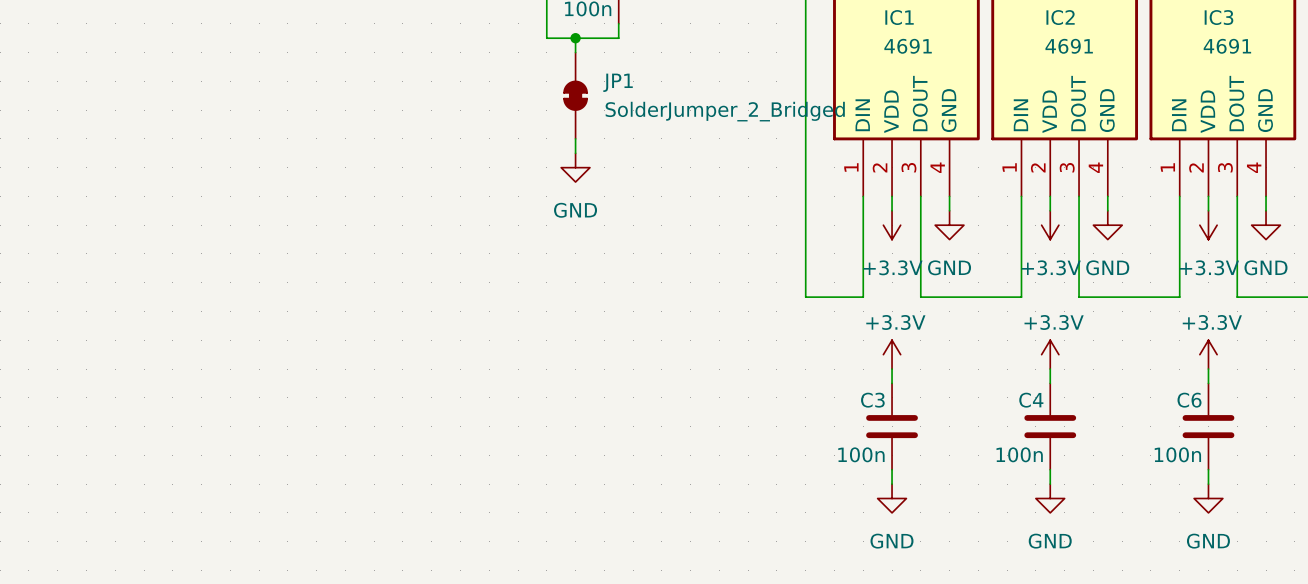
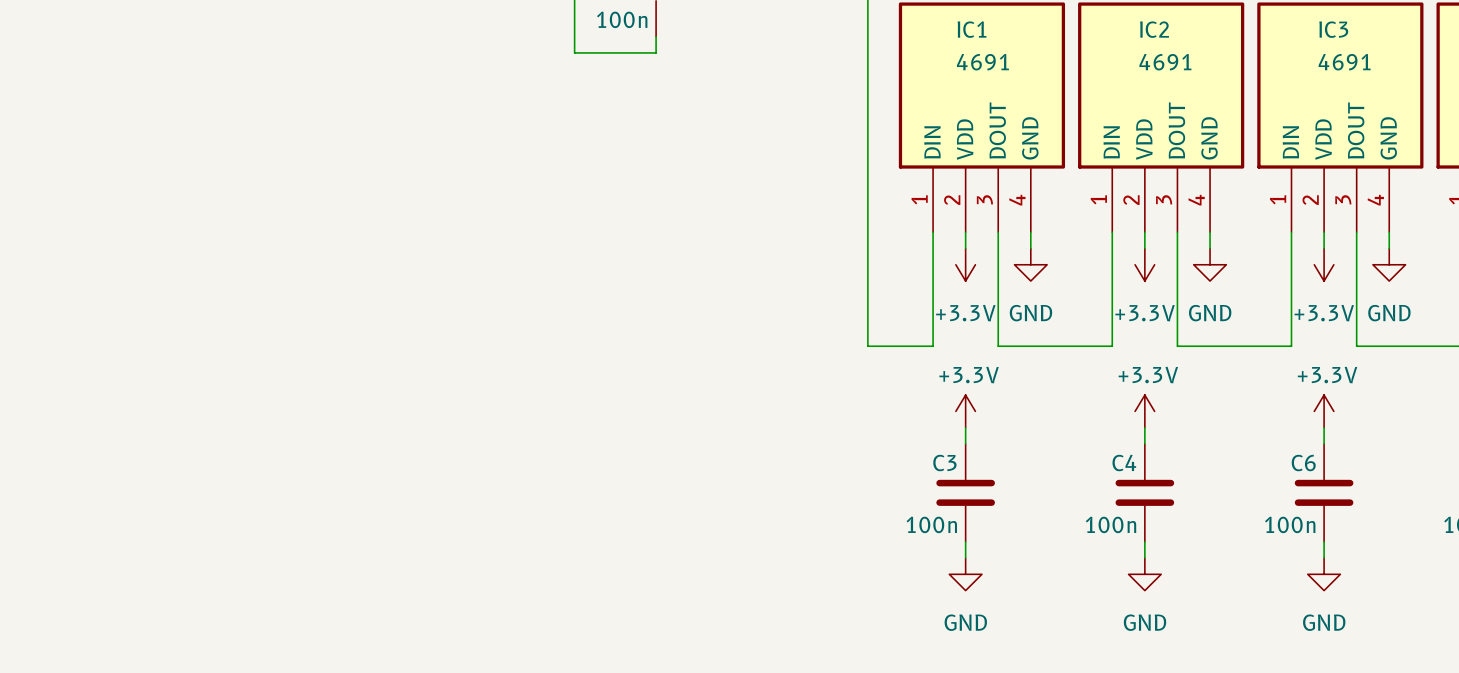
wire: (575, 38) (575, 52) -> none
junction: (575, 38) -> none
JP1: SolderJumper_2_Bridged (575, 95) -> none
wire: (575, 138) (575, 153) -> none
power symbol: GND (575, 167) -> none

